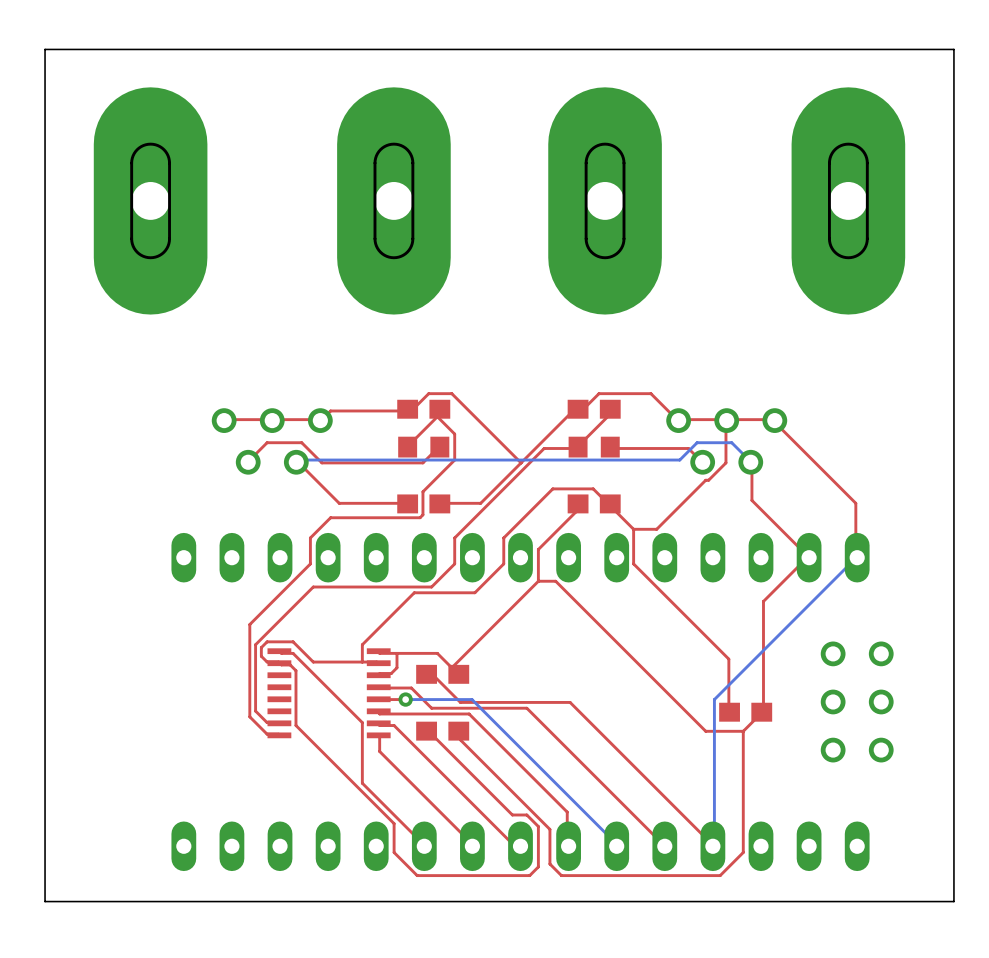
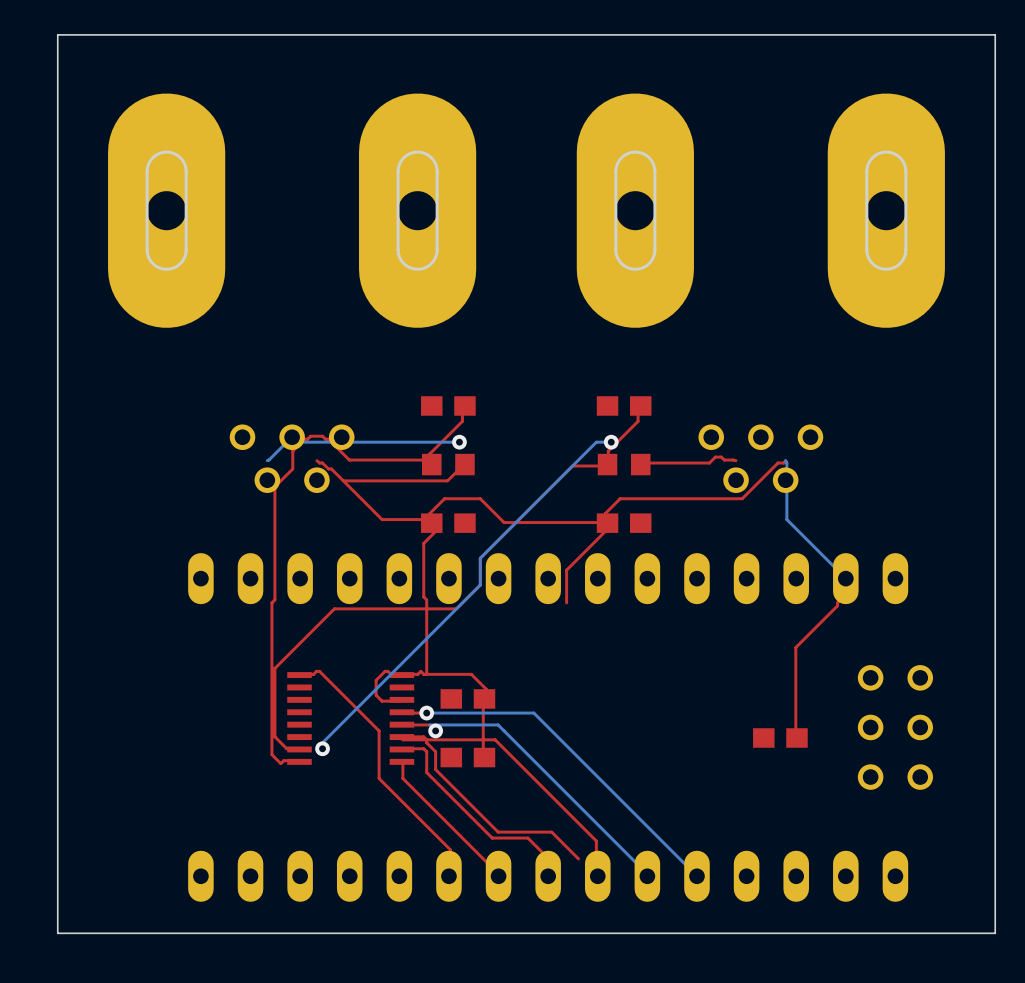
board edge: (953, 49) (45, 49) -> (995, 54) (995, 34) (57, 34) (57, 54)
part position: (423, 409) -> (448, 405)
part position: (594, 409) -> (624, 405)
top track: (610, 409) (607, 410) (607, 416) (578, 445) -> (640, 405) (638, 406) (638, 421) (608, 451) (608, 463)
top track: (437, 416) (454, 434) (454, 460) (422, 491) (422, 514) (420, 517) (330, 517) (310, 537) (310, 563) (249, 624) (249, 716) (267, 734) -> (310, 436) (304, 439) (292, 451) (292, 468) (274, 486) (274, 599) (271, 602) (271, 754) (280, 763) (286, 760)
top track: (437, 416) (407, 447) -> none
top track: (290, 419) (224, 420) -> none
top track: (301, 419) (320, 420) (330, 410) (405, 410) (408, 408) (414, 408) (428, 393) (451, 393) (521, 462) -> (322, 436) (328, 439) (349, 460) (429, 460) (431, 464) (429, 463) (429, 454) (462, 421) (462, 406) (464, 405)
top track: (726, 420) (725, 462) -> (785, 460) (783, 463) (777, 463) (760, 480)
top track: (726, 420) (678, 420) (650, 393) (598, 393) (584, 408) (575, 408) (480, 503) -> (739, 498) (620, 498) (605, 513) (605, 522) (507, 522)
top track: (726, 420) (774, 420) (855, 503) (857, 557) -> none
bottom track: none -> (459, 442) (286, 442) (267, 460)
via: none -> (459, 442)
bottom track: none -> (611, 442) (596, 442) (480, 558) (480, 585) (322, 742) (322, 748)
via: none -> (611, 442)
bottom track: none -> (785, 460) (786, 519) (845, 578)
top track: (610, 447) (688, 448) (702, 462) -> (640, 464) (641, 463) (709, 463) (715, 457) (736, 460)
top track: (310, 451) (301, 442) (267, 442) (248, 462) -> (331, 468) (316, 460)
top track: (296, 462) (339, 503) (405, 503) -> none
top track: none -> (343, 480) (382, 519) (429, 519) (435, 528) (435, 531) (423, 543) (423, 596) (426, 599) (426, 674)
top track: (750, 462) (751, 500) (809, 557) -> none
bottom track: (750, 462) (731, 442) (697, 442) (679, 460) (298, 460) (296, 462) -> none
top track: (705, 480) (656, 529) (633, 529) -> none
top track: (477, 503) (439, 503) -> (504, 522) (480, 498) (444, 498) (429, 513) (429, 522)
top track: (633, 529) (633, 563) (728, 659) (729, 712) -> none
top track: (633, 529) (593, 488) (552, 488) (503, 537) (503, 563) (474, 592) (414, 592) (362, 644) (362, 662) -> none
bottom track: (857, 557) (714, 699) (714, 843) (712, 846) -> none
top track: (806, 558) (763, 601) (763, 711) (743, 731) -> (843, 579) (843, 596) (837, 602) (837, 605) (795, 647) (796, 738)
top track: (298, 647) (293, 641) (267, 641) (261, 647) (261, 656) (267, 662) (290, 664) (295, 670) (295, 725) (394, 823) (394, 852) (417, 875) (529, 875) (538, 866) (538, 826) (526, 814) (512, 814) (426, 731) -> (319, 671) (313, 674) (299, 675)
top track: (279, 651) (281, 653) (293, 653) (362, 722) (362, 783) (424, 846) -> (334, 686) (379, 730) (379, 778) (450, 849) (448, 876)
top track: (378, 651) (379, 653) (437, 653) (457, 673) (458, 674) (451, 667) (538, 581) (555, 581) (705, 731) (743, 731) -> none
top track: (396, 653) (396, 667) (391, 673) (379, 673) (378, 675) -> (484, 757) (483, 701) (486, 698) (486, 689) (471, 674) (423, 674) (420, 671) (417, 674) (401, 675) (391, 674) (385, 671) (376, 680) (376, 695) (382, 701) (401, 699)
top track: (313, 662) (378, 663) -> none
top track: (426, 674) (428, 676) (434, 676) (460, 702) (570, 702) (712, 846) -> none
top track: (402, 688) (411, 688) (431, 708) (526, 708) (664, 846) -> none
bottom track: none -> (426, 713) (533, 713) (696, 876)
via: none -> (426, 713)
via: (405, 699) -> none
via: none -> (435, 730)
via: none -> (322, 748)
top track: (378, 723) (379, 725) (394, 725) (411, 742) -> (401, 737) (423, 736) (435, 751) (435, 769)
top track: none -> (401, 749) (423, 748) (426, 751) (426, 772) (492, 838) (527, 838) (545, 855) (545, 873)
top track: (458, 731) (460, 731) (460, 739) (523, 803) -> none
top track: (743, 731) (743, 852) (720, 875) (561, 875) (549, 864) (549, 829) -> none
top track: (472, 803) (512, 843) (518, 843) -> (498, 832) (551, 832)

